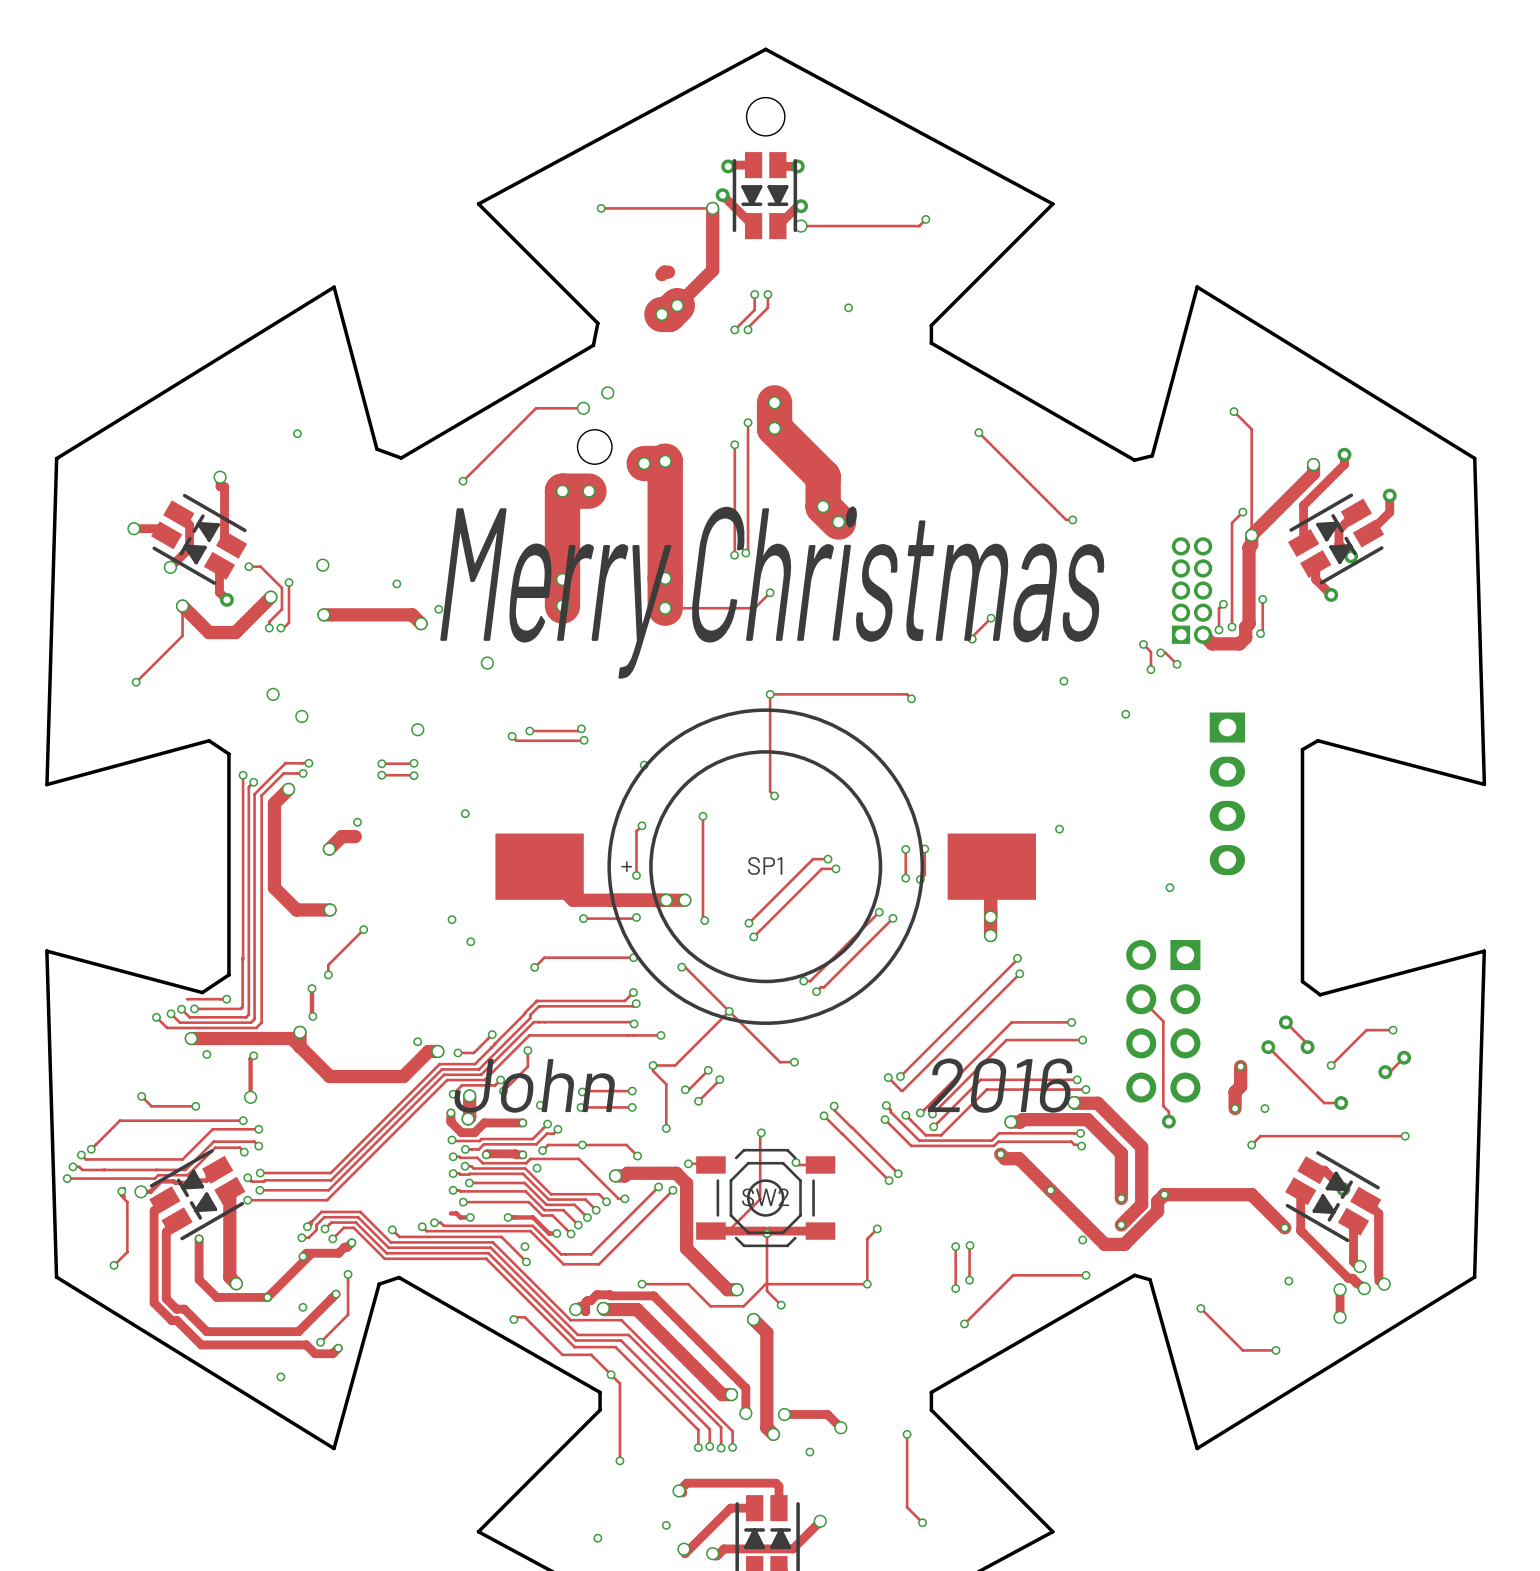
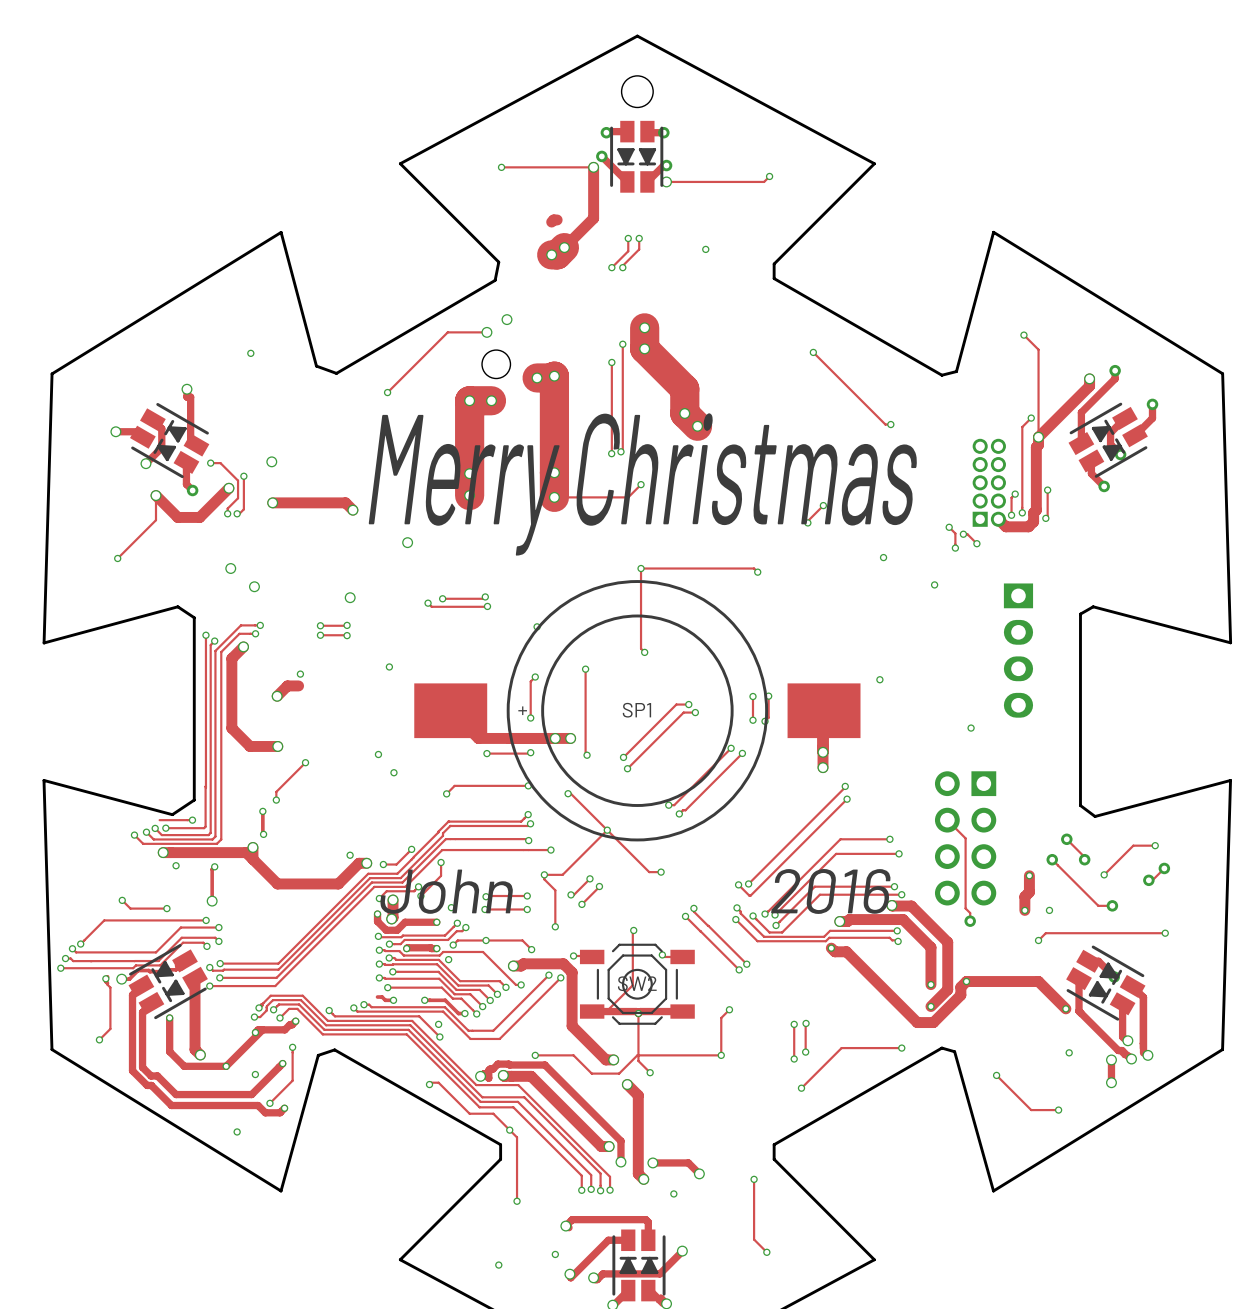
via: (396, 583) -> none
via: (438, 609) -> none
via: (1050, 1190) -> none
via: (1082, 1239) -> none

